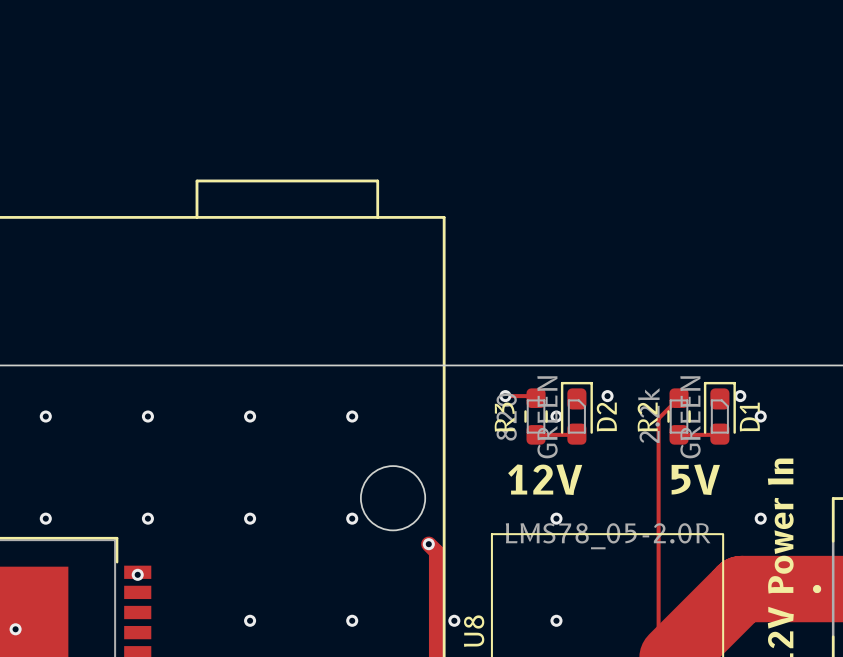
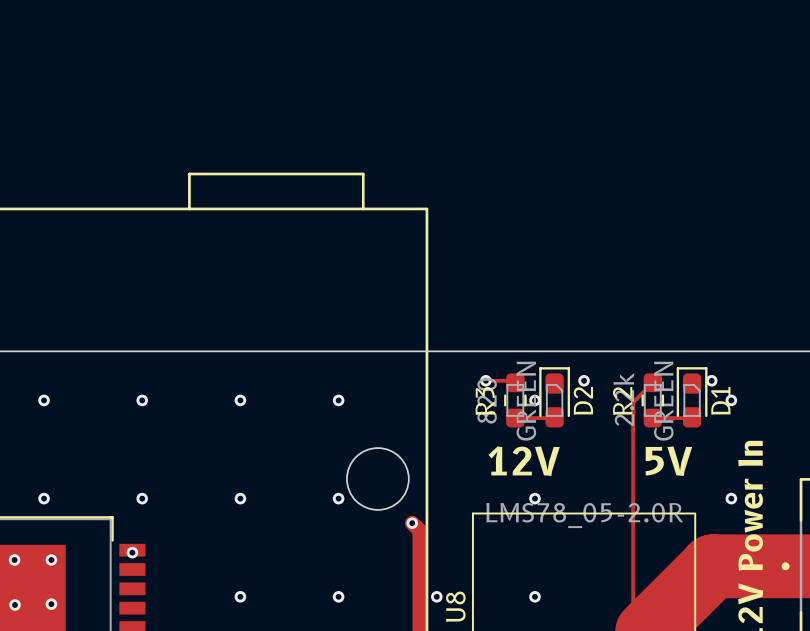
via: none -> (14, 559)
via: none -> (51, 559)
via: none -> (51, 604)

